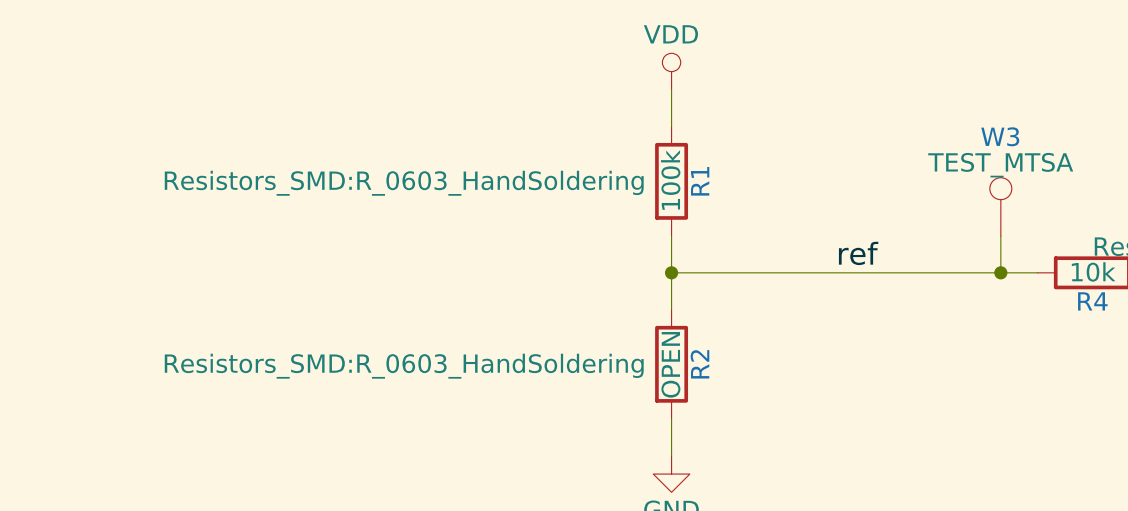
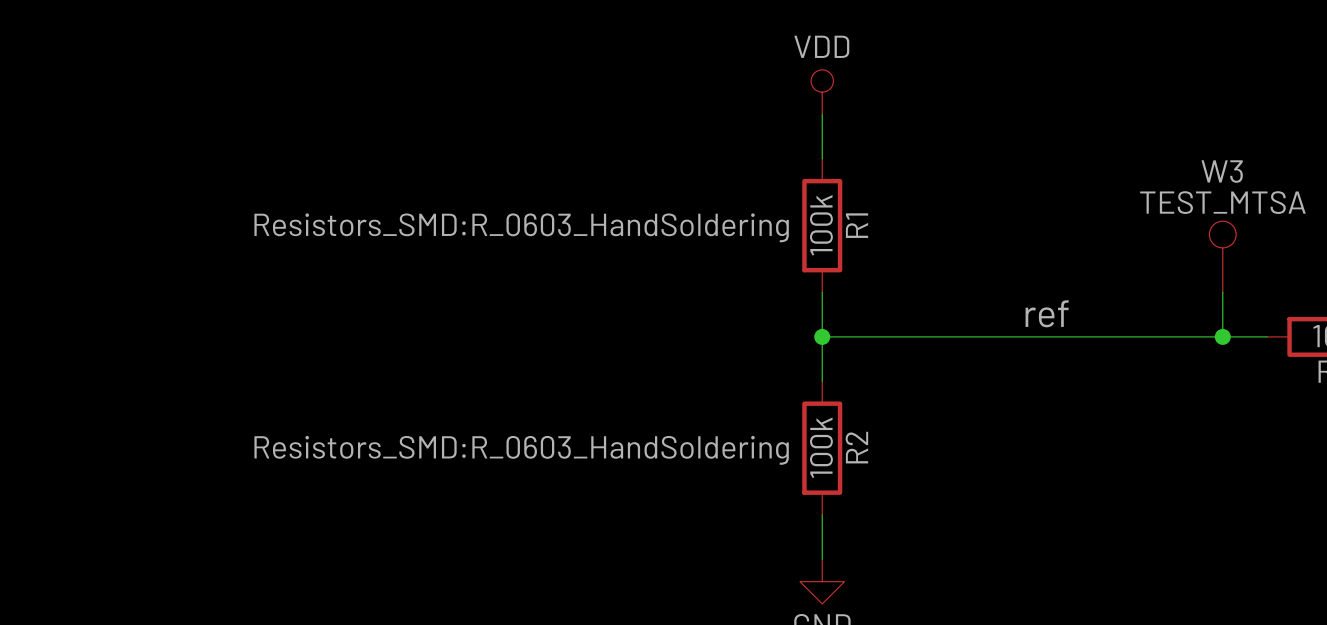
R2 value: OPEN (670, 364) -> 100k (821, 447)

